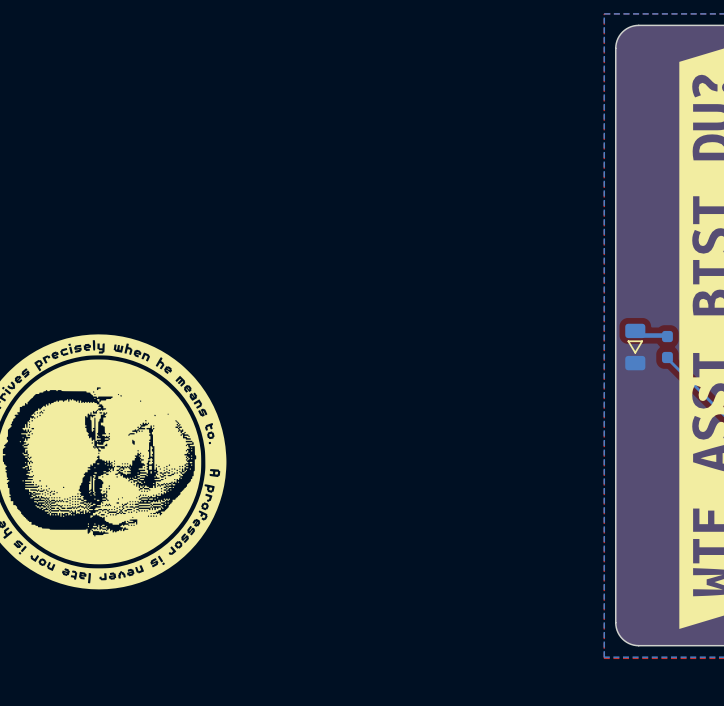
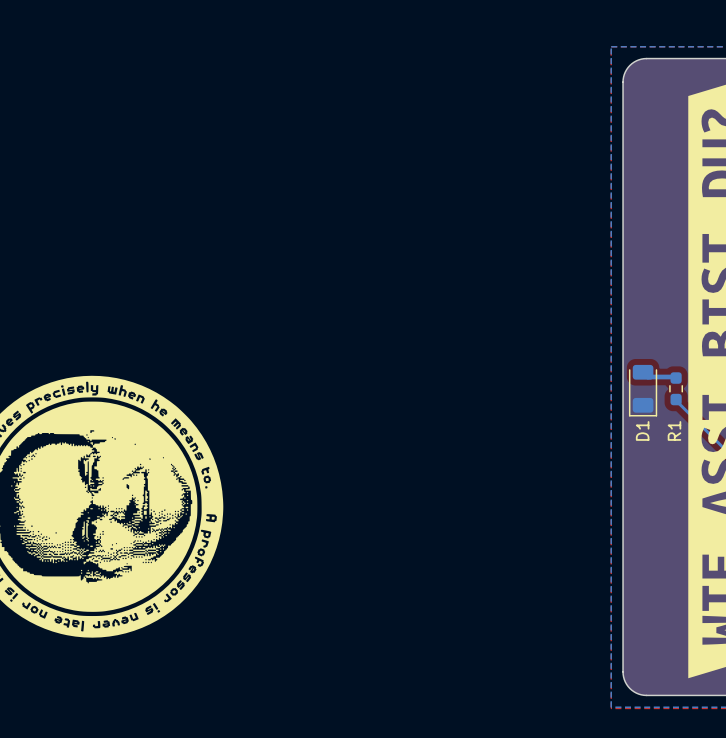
line: (642, 341) (635, 352) (628, 341) (642, 341) -> none
part: (635, 347) -> none
part: (667, 347) -> none
R1: none -> (676, 388)
D1: none -> (643, 390)

